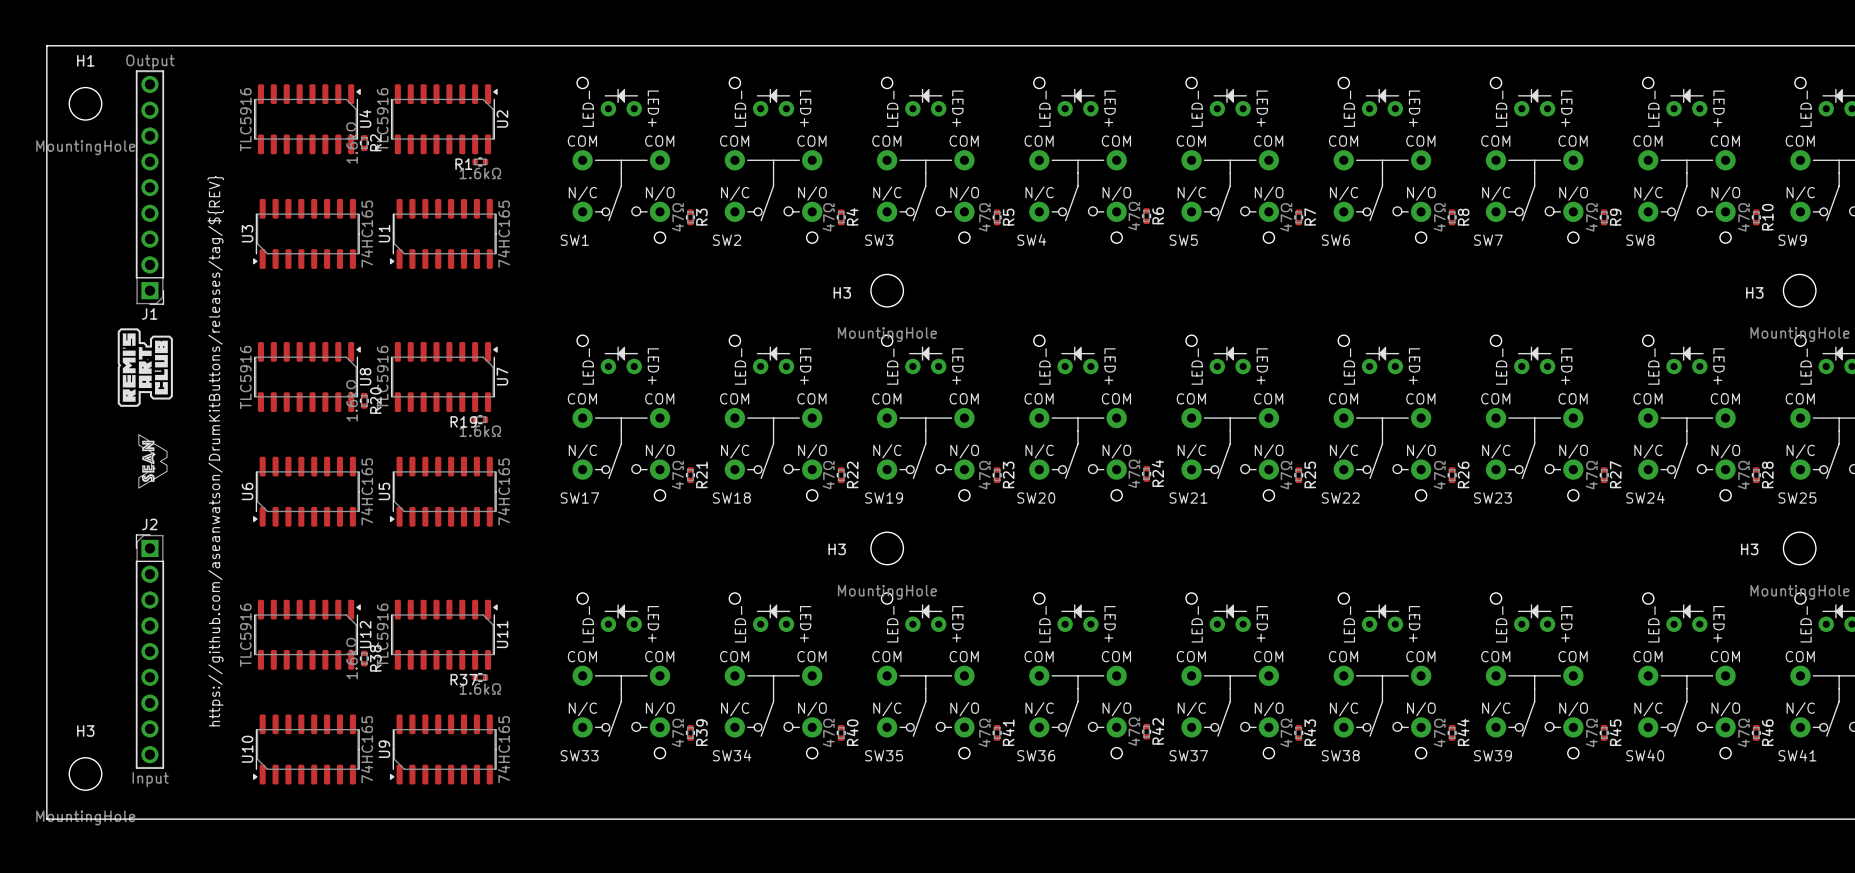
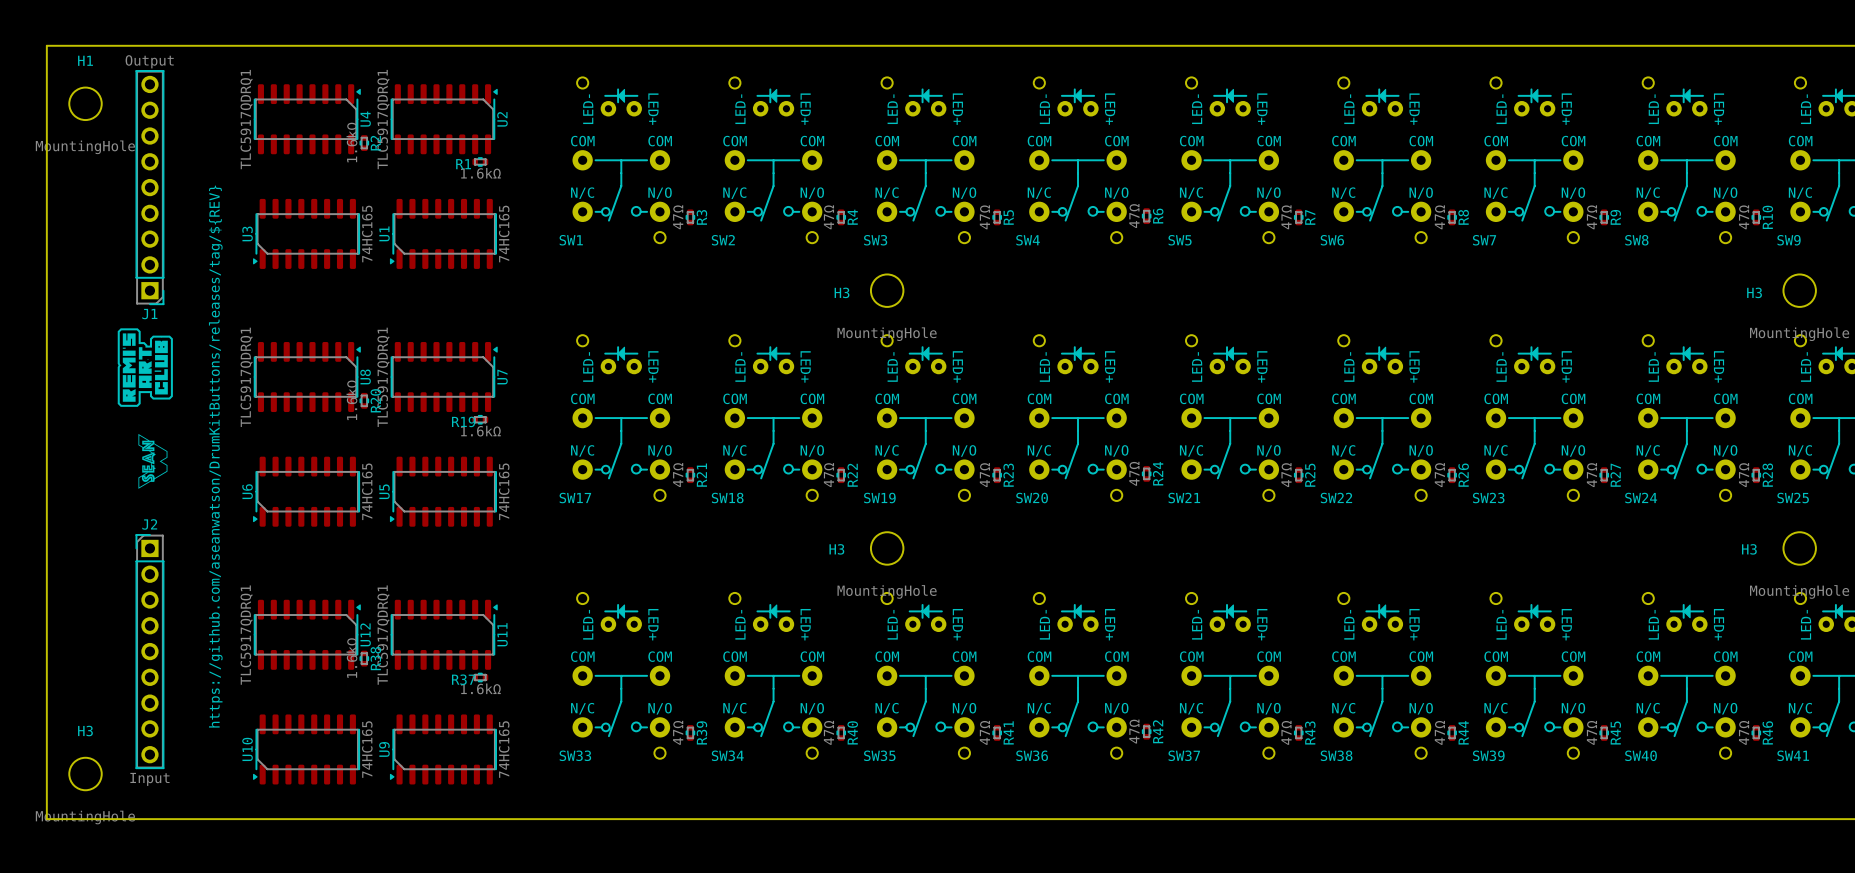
U4 value: TLC5916 (245, 119) -> TLC5917QDRQ1 (246, 119)
U2 value: TLC5916 (382, 119) -> TLC5917QDRQ1 (383, 119)
U8 value: TLC5916 (245, 377) -> TLC5917QDRQ1 (246, 377)
U7 value: TLC5916 (382, 377) -> TLC5917QDRQ1 (383, 377)
U12 value: TLC5916 (245, 635) -> TLC5917QDRQ1 (246, 635)
U11 value: TLC5916 (382, 635) -> TLC5917QDRQ1 (383, 635)

